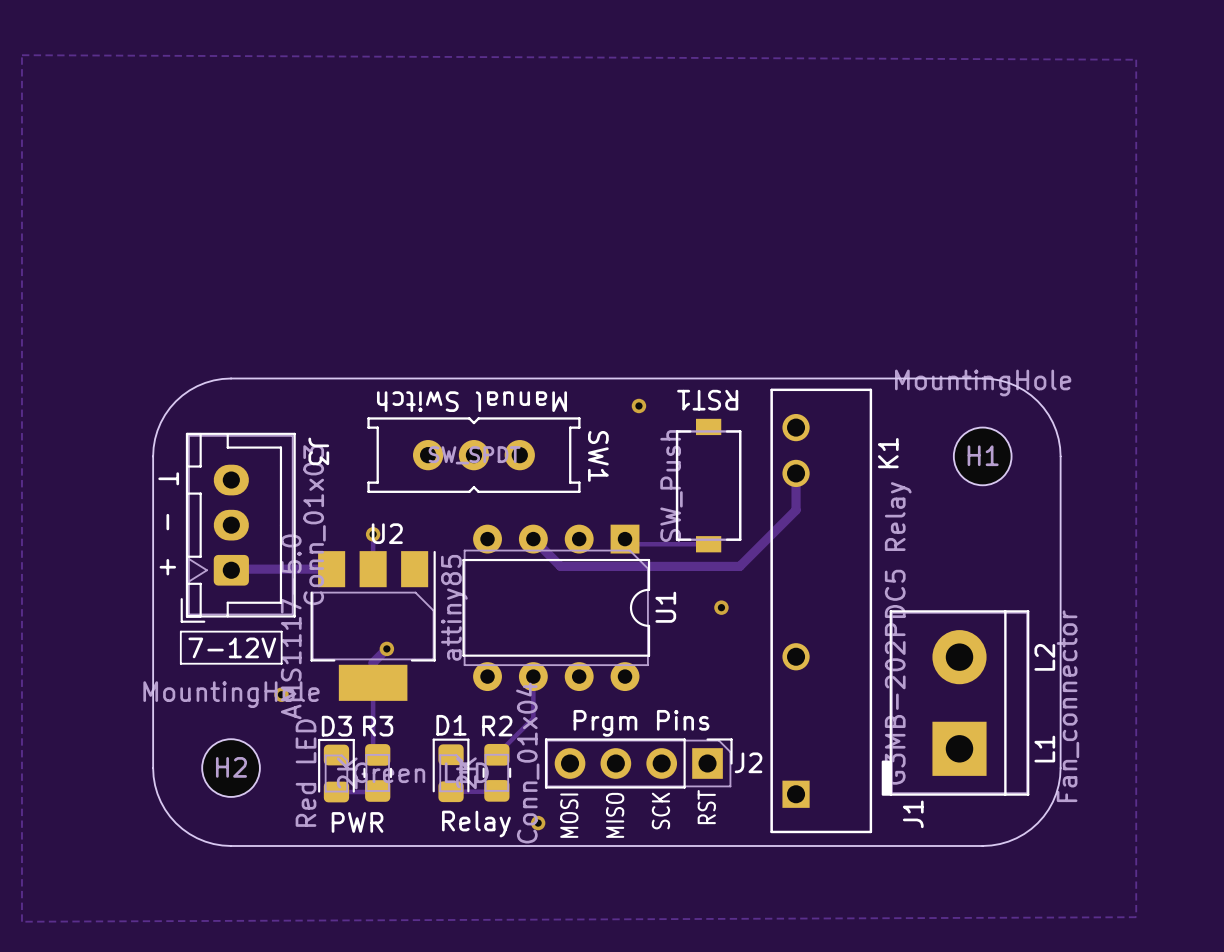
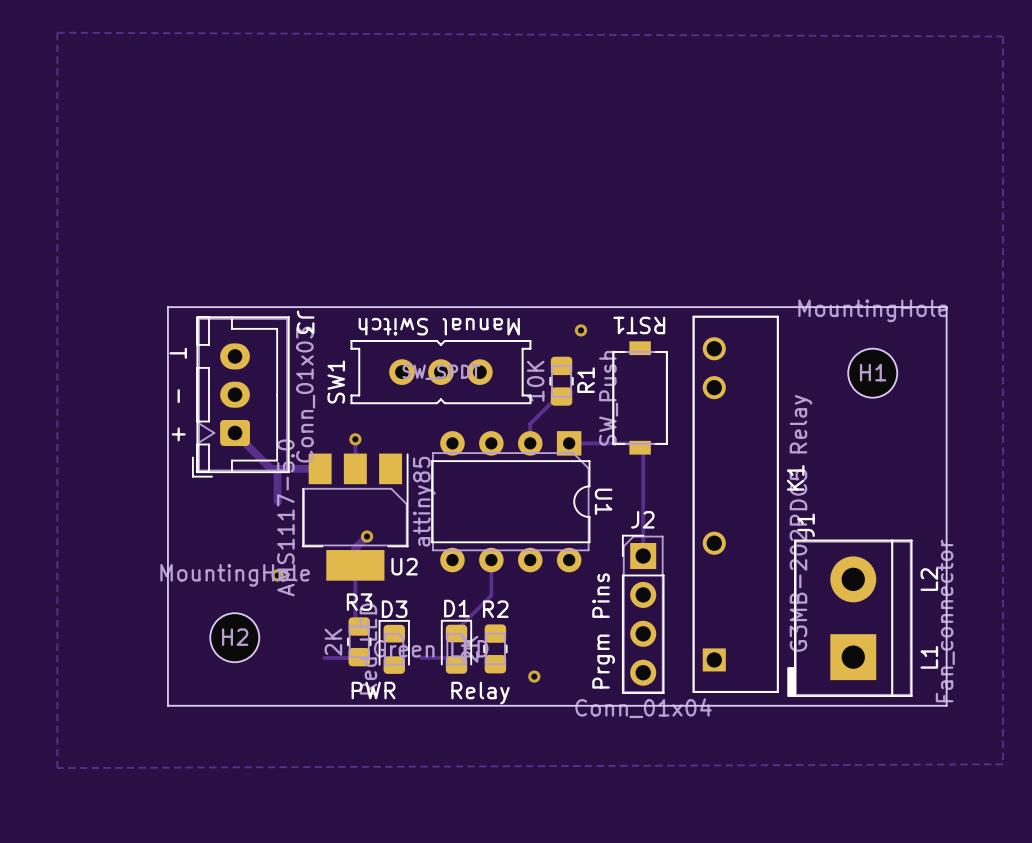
board edge: (231, 378) (982, 378) (1000, 380) (1016, 386) (1031, 395) (1043, 407) (1056, 430) (1060, 447) (1060, 768) (1058, 785) (1052, 801) (1037, 823) (1024, 834) (1008, 841) (982, 845) (231, 845) (213, 844) (197, 838) (182, 828) (165, 809) (157, 793) (153, 776) (153, 447) (160, 422) (170, 407) (182, 395) (205, 382) (231, 378) -> (167, 307) (167, 705) (946, 705) (946, 307) (167, 307)
J3 name position: J3 (318, 451) -> J3 (305, 322)
K1 name position: K1 (888, 453) -> K1 (795, 477)
SW1 name rotation: 0° (598, 456) -> 180° (336, 382)
SW1 name position: SW1 (598, 456) -> SW1 (336, 382)
R1: none -> 10K (561, 381)
track: (796, 473) (796, 510) (739, 566) (560, 566) (533, 539) -> none
text position: T (168, 478) -> T (178, 353)
track: none -> (561, 396) (557, 396) (530, 423) (530, 443)
text position: - (167, 522) -> - (178, 396)
J3 position: (238, 527) -> (240, 396)
U2 name position: U2 (387, 533) -> U2 (404, 566)
track: (625, 539) (630, 544) (708, 544) -> (569, 443) (635, 443) (643, 450) (643, 556)
text position: + (167, 567) -> + (178, 434)
track: (273, 569) (231, 570) -> (270, 468) (235, 433)
track: none -> (277, 468) (278, 501)
U1 name rotation: 0° (665, 607) -> 180° (603, 501)
via: (721, 607) -> none
line: (180, 631) (281, 631) (281, 663) (180, 663) (180, 631) -> none
text: 7-12V (232, 647) -> none
text position: L2 (1044, 657) -> L2 (929, 579)
J1 position: (955, 702) -> (849, 618)
text rotation: 0° (641, 723) -> 90° counterclockwise (603, 630)
text position: L1 (1044, 749) -> L1 (929, 657)
J2 rotation: 0° (638, 763) -> 90° counterclockwise (643, 614)
D3 position: (336, 770) -> (394, 646)
D1 position: (451, 770) -> (456, 646)
R2 position: (496, 772) -> (495, 648)
text: RST (706, 807) -> none
text: SCK (660, 811) -> none
J1 name position: J1 (913, 814) -> J1 (806, 525)
text: MOSI (569, 815) -> none
text: MISO (615, 815) -> none
text position: PWR (357, 822) -> PWR (373, 690)
via position: (538, 823) -> (534, 676)
text position: Relay (476, 824) -> Relay (480, 693)

